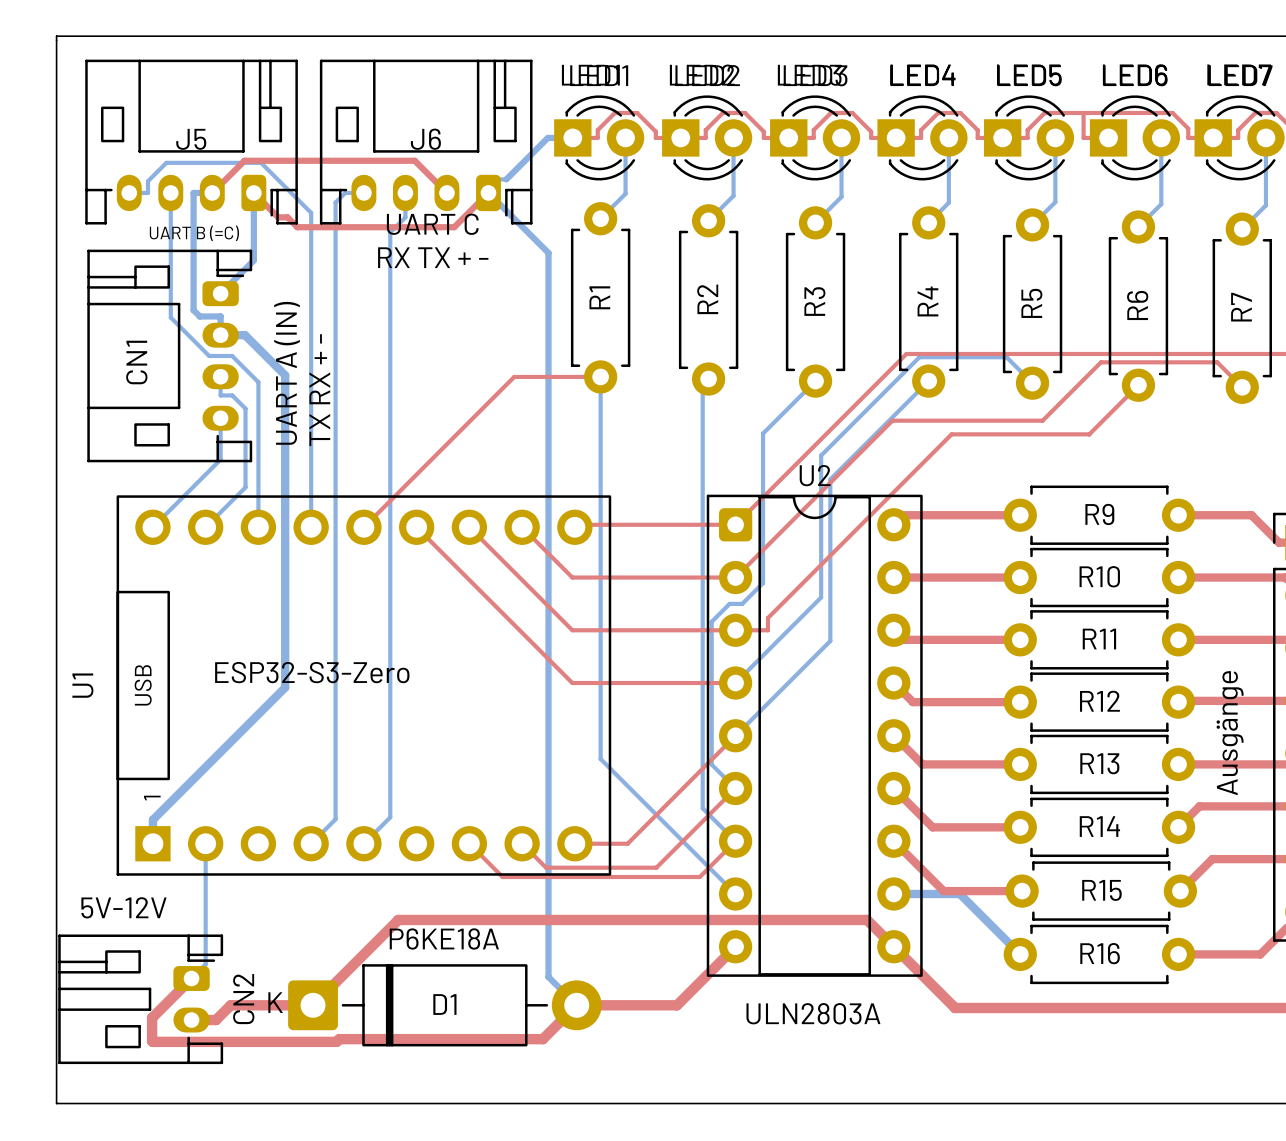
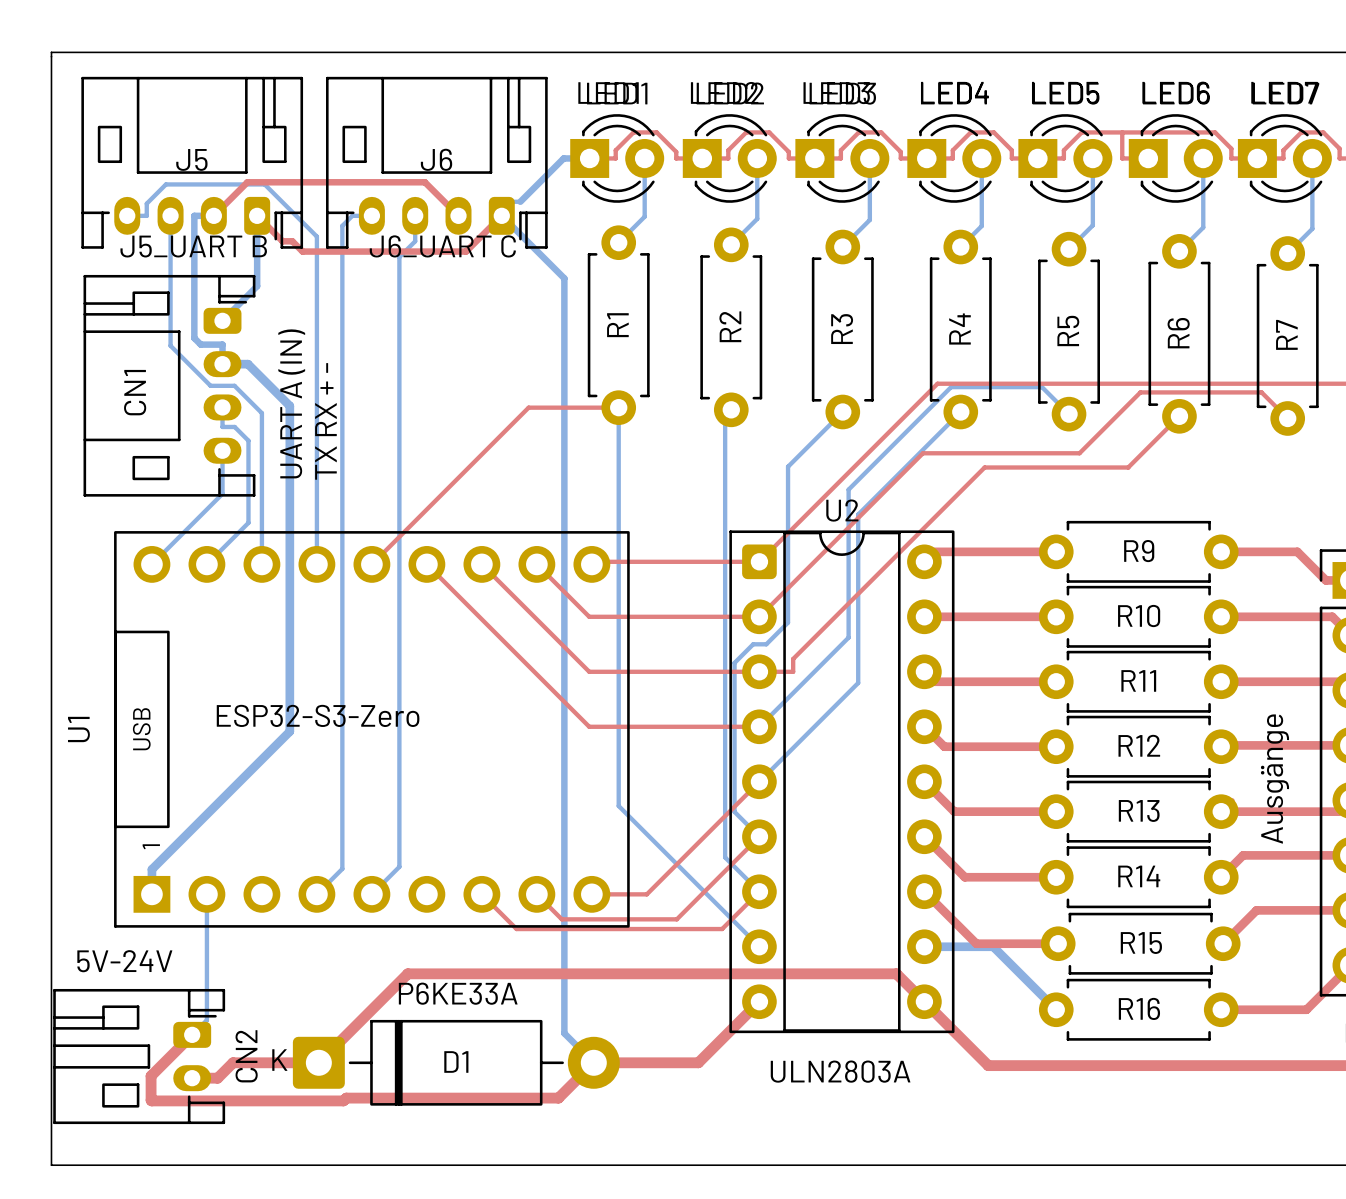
text: UART C (432, 224) -> J6_UART C (442, 246)
text: UART B (=C) (194, 233) -> J5_UART B (193, 246)
text: RX TX + - (433, 257) -> none
text: 5V-12V (123, 907) -> 5V-24V (124, 961)
text: P6KE18A (444, 938) -> P6KE33A (458, 993)

